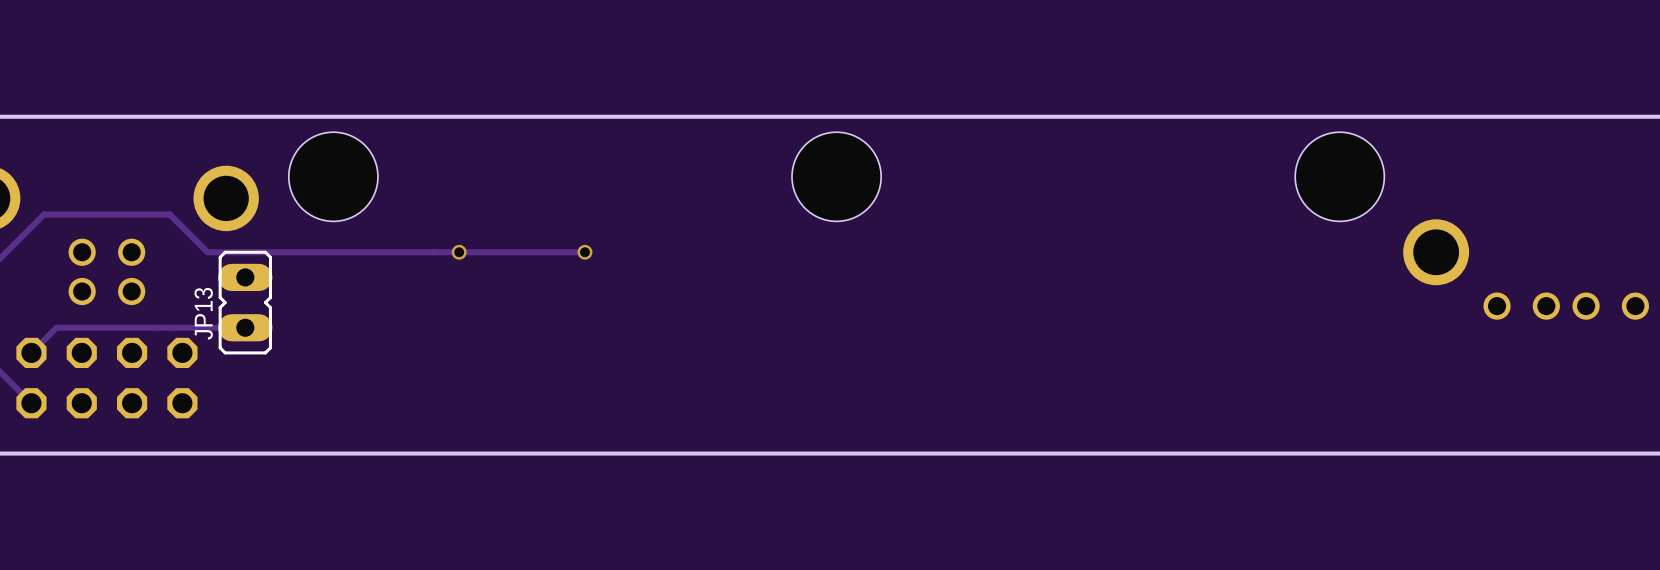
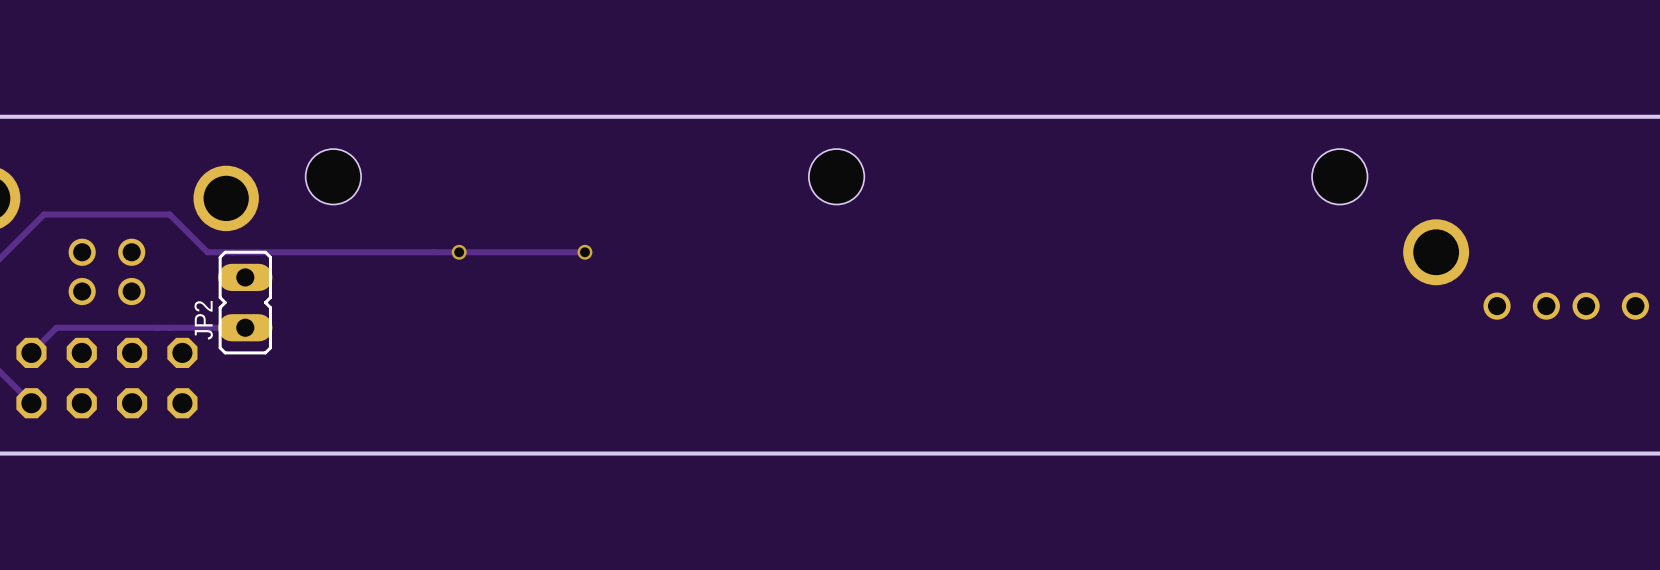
hole: (333, 176) -> none
part: none -> (333, 176)
hole: (836, 176) -> none
part: none -> (836, 176)
hole: (1339, 176) -> none
part: none -> (1339, 176)
JP13 name: JP13 (203, 313) -> JP2 (203, 320)

